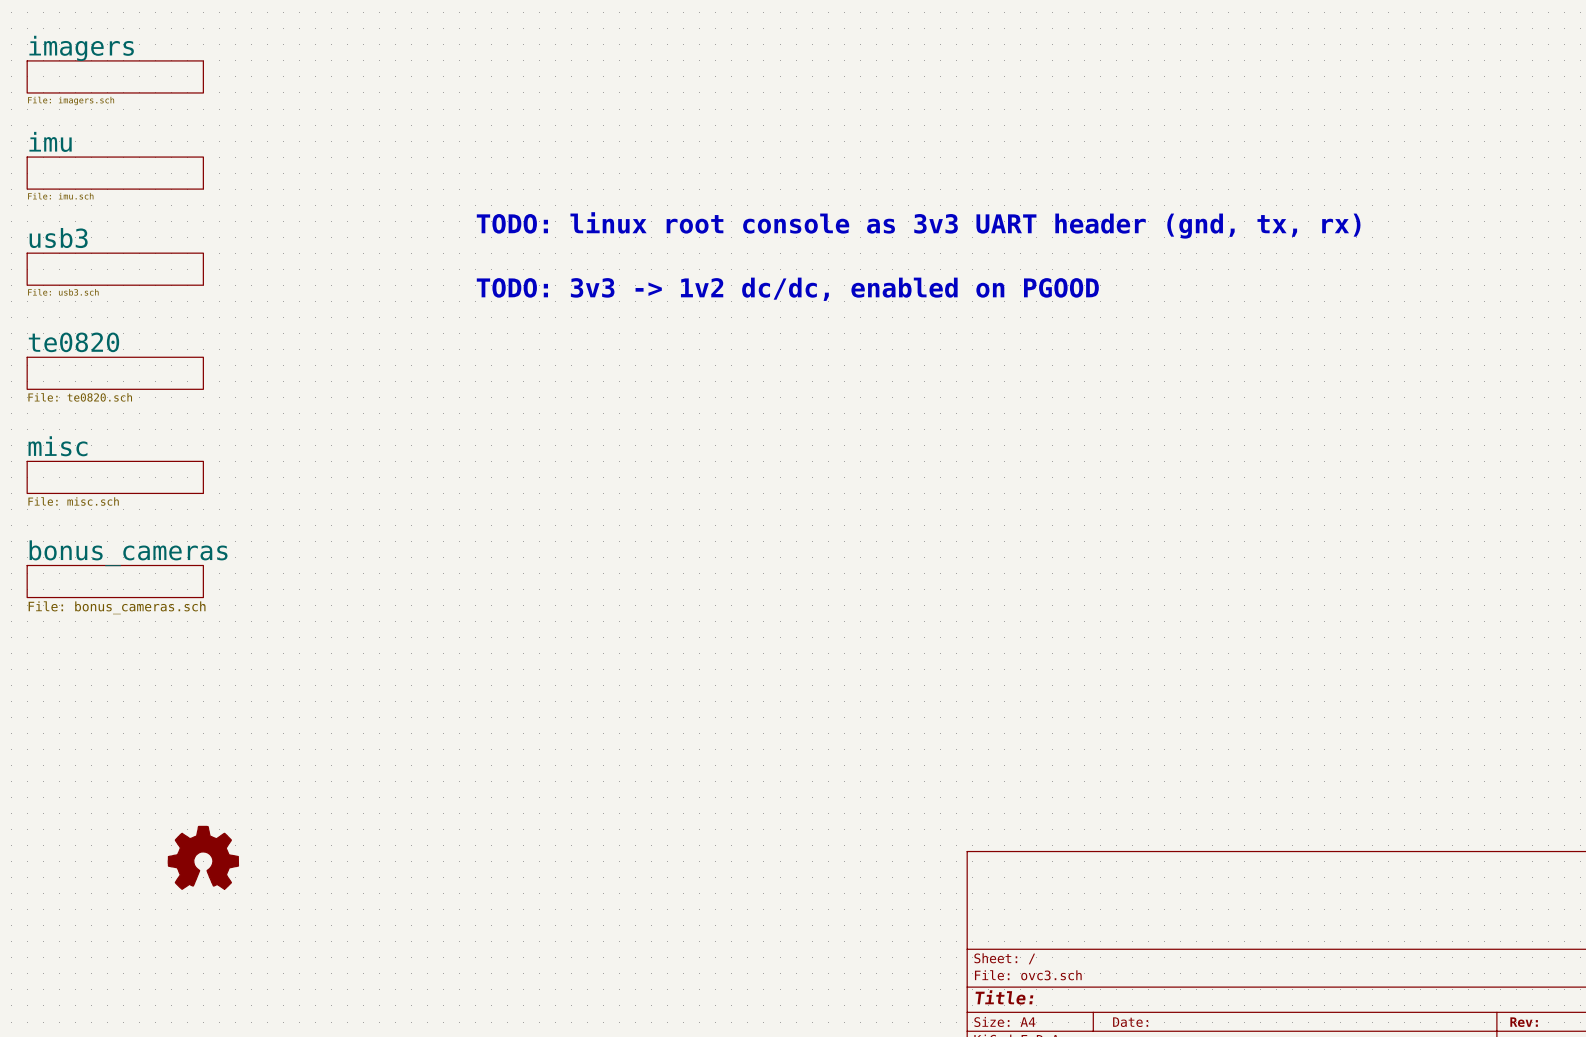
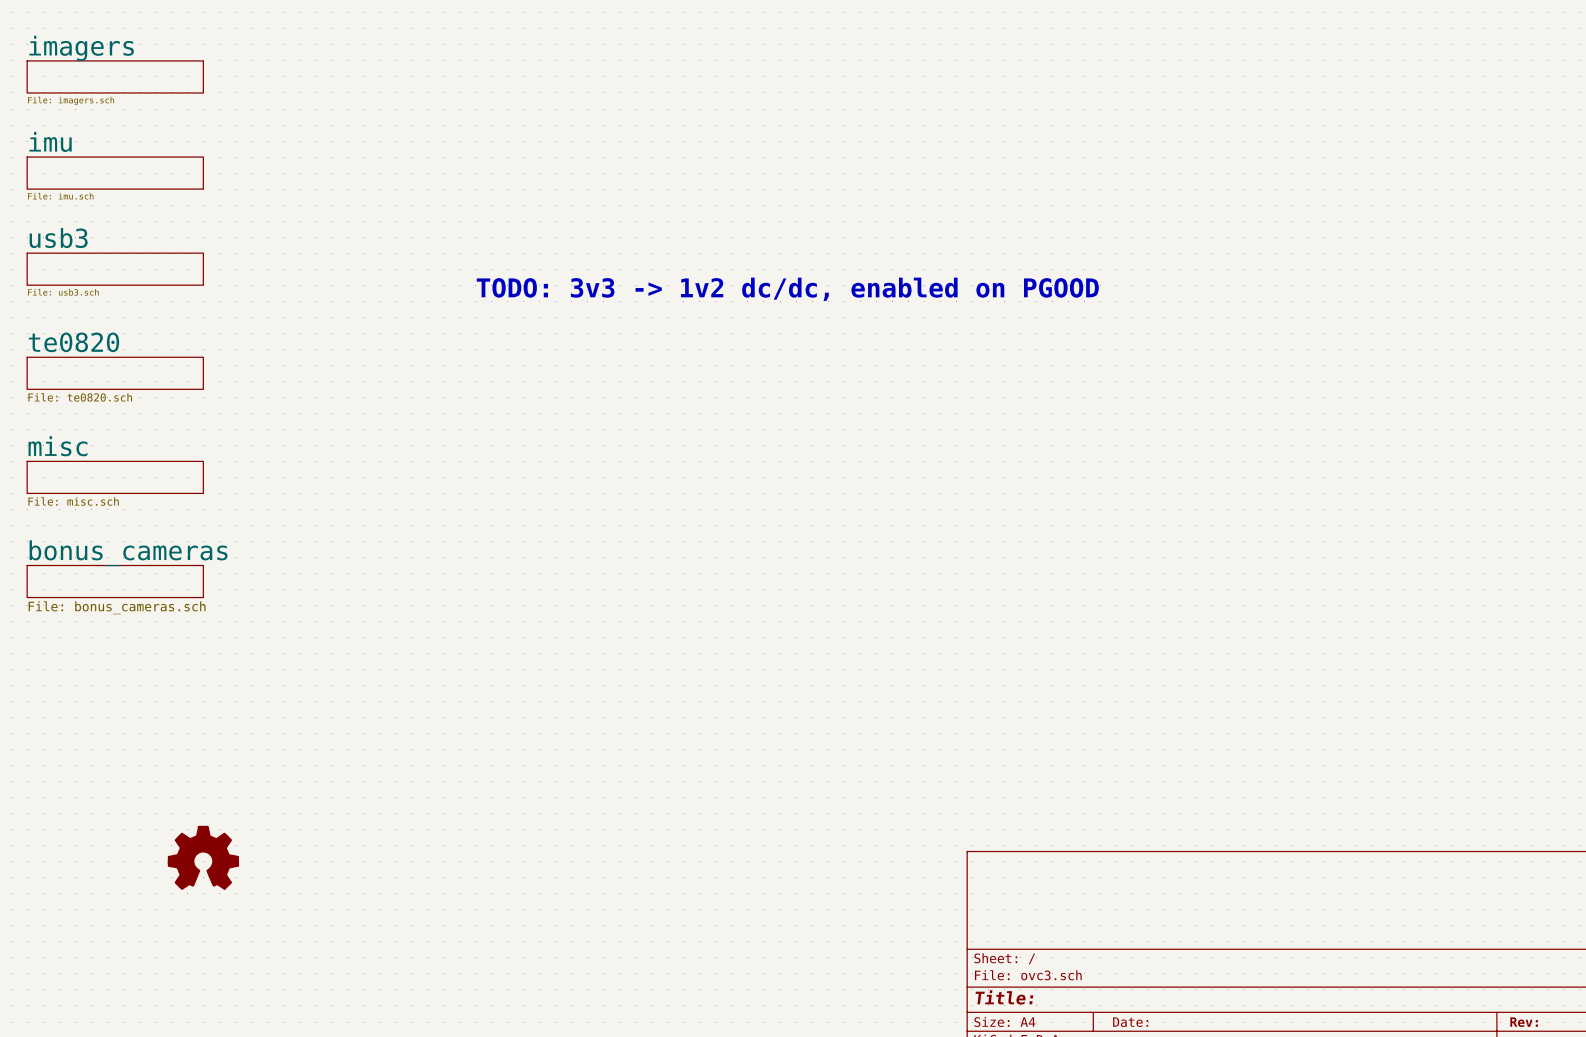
text: TODO: linux root console as 3v3 UART header (gnd, tx, rx) (918, 225) -> none

